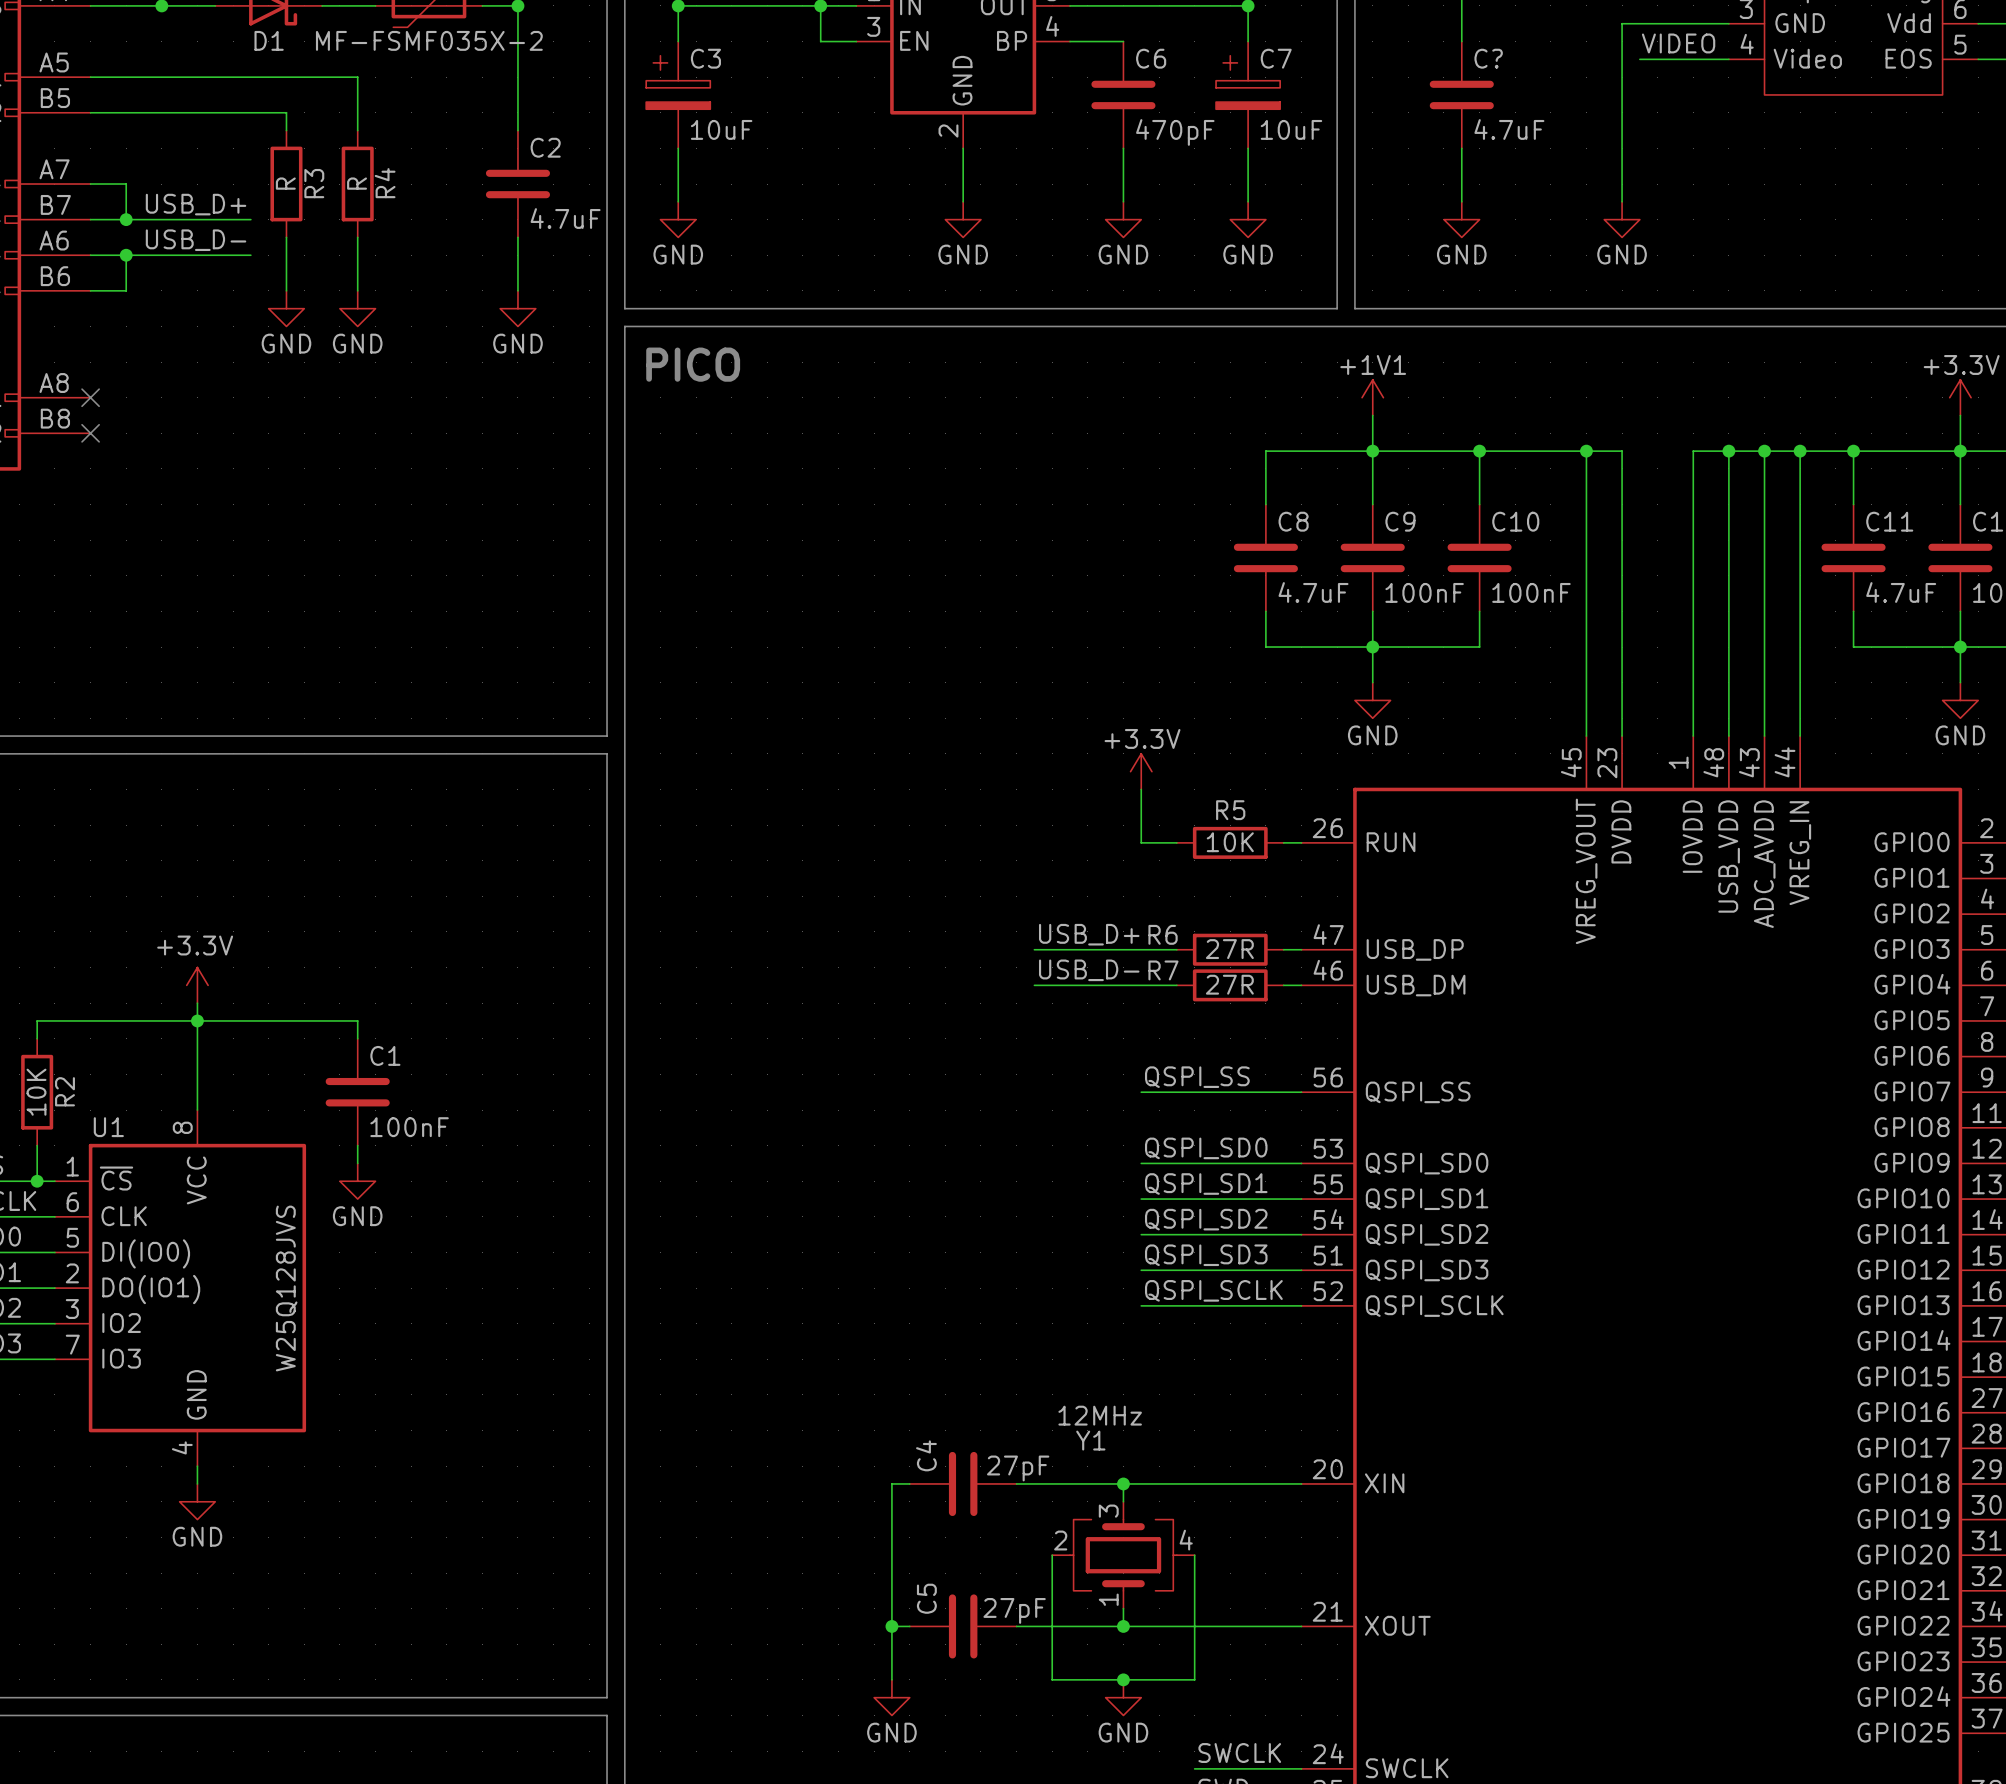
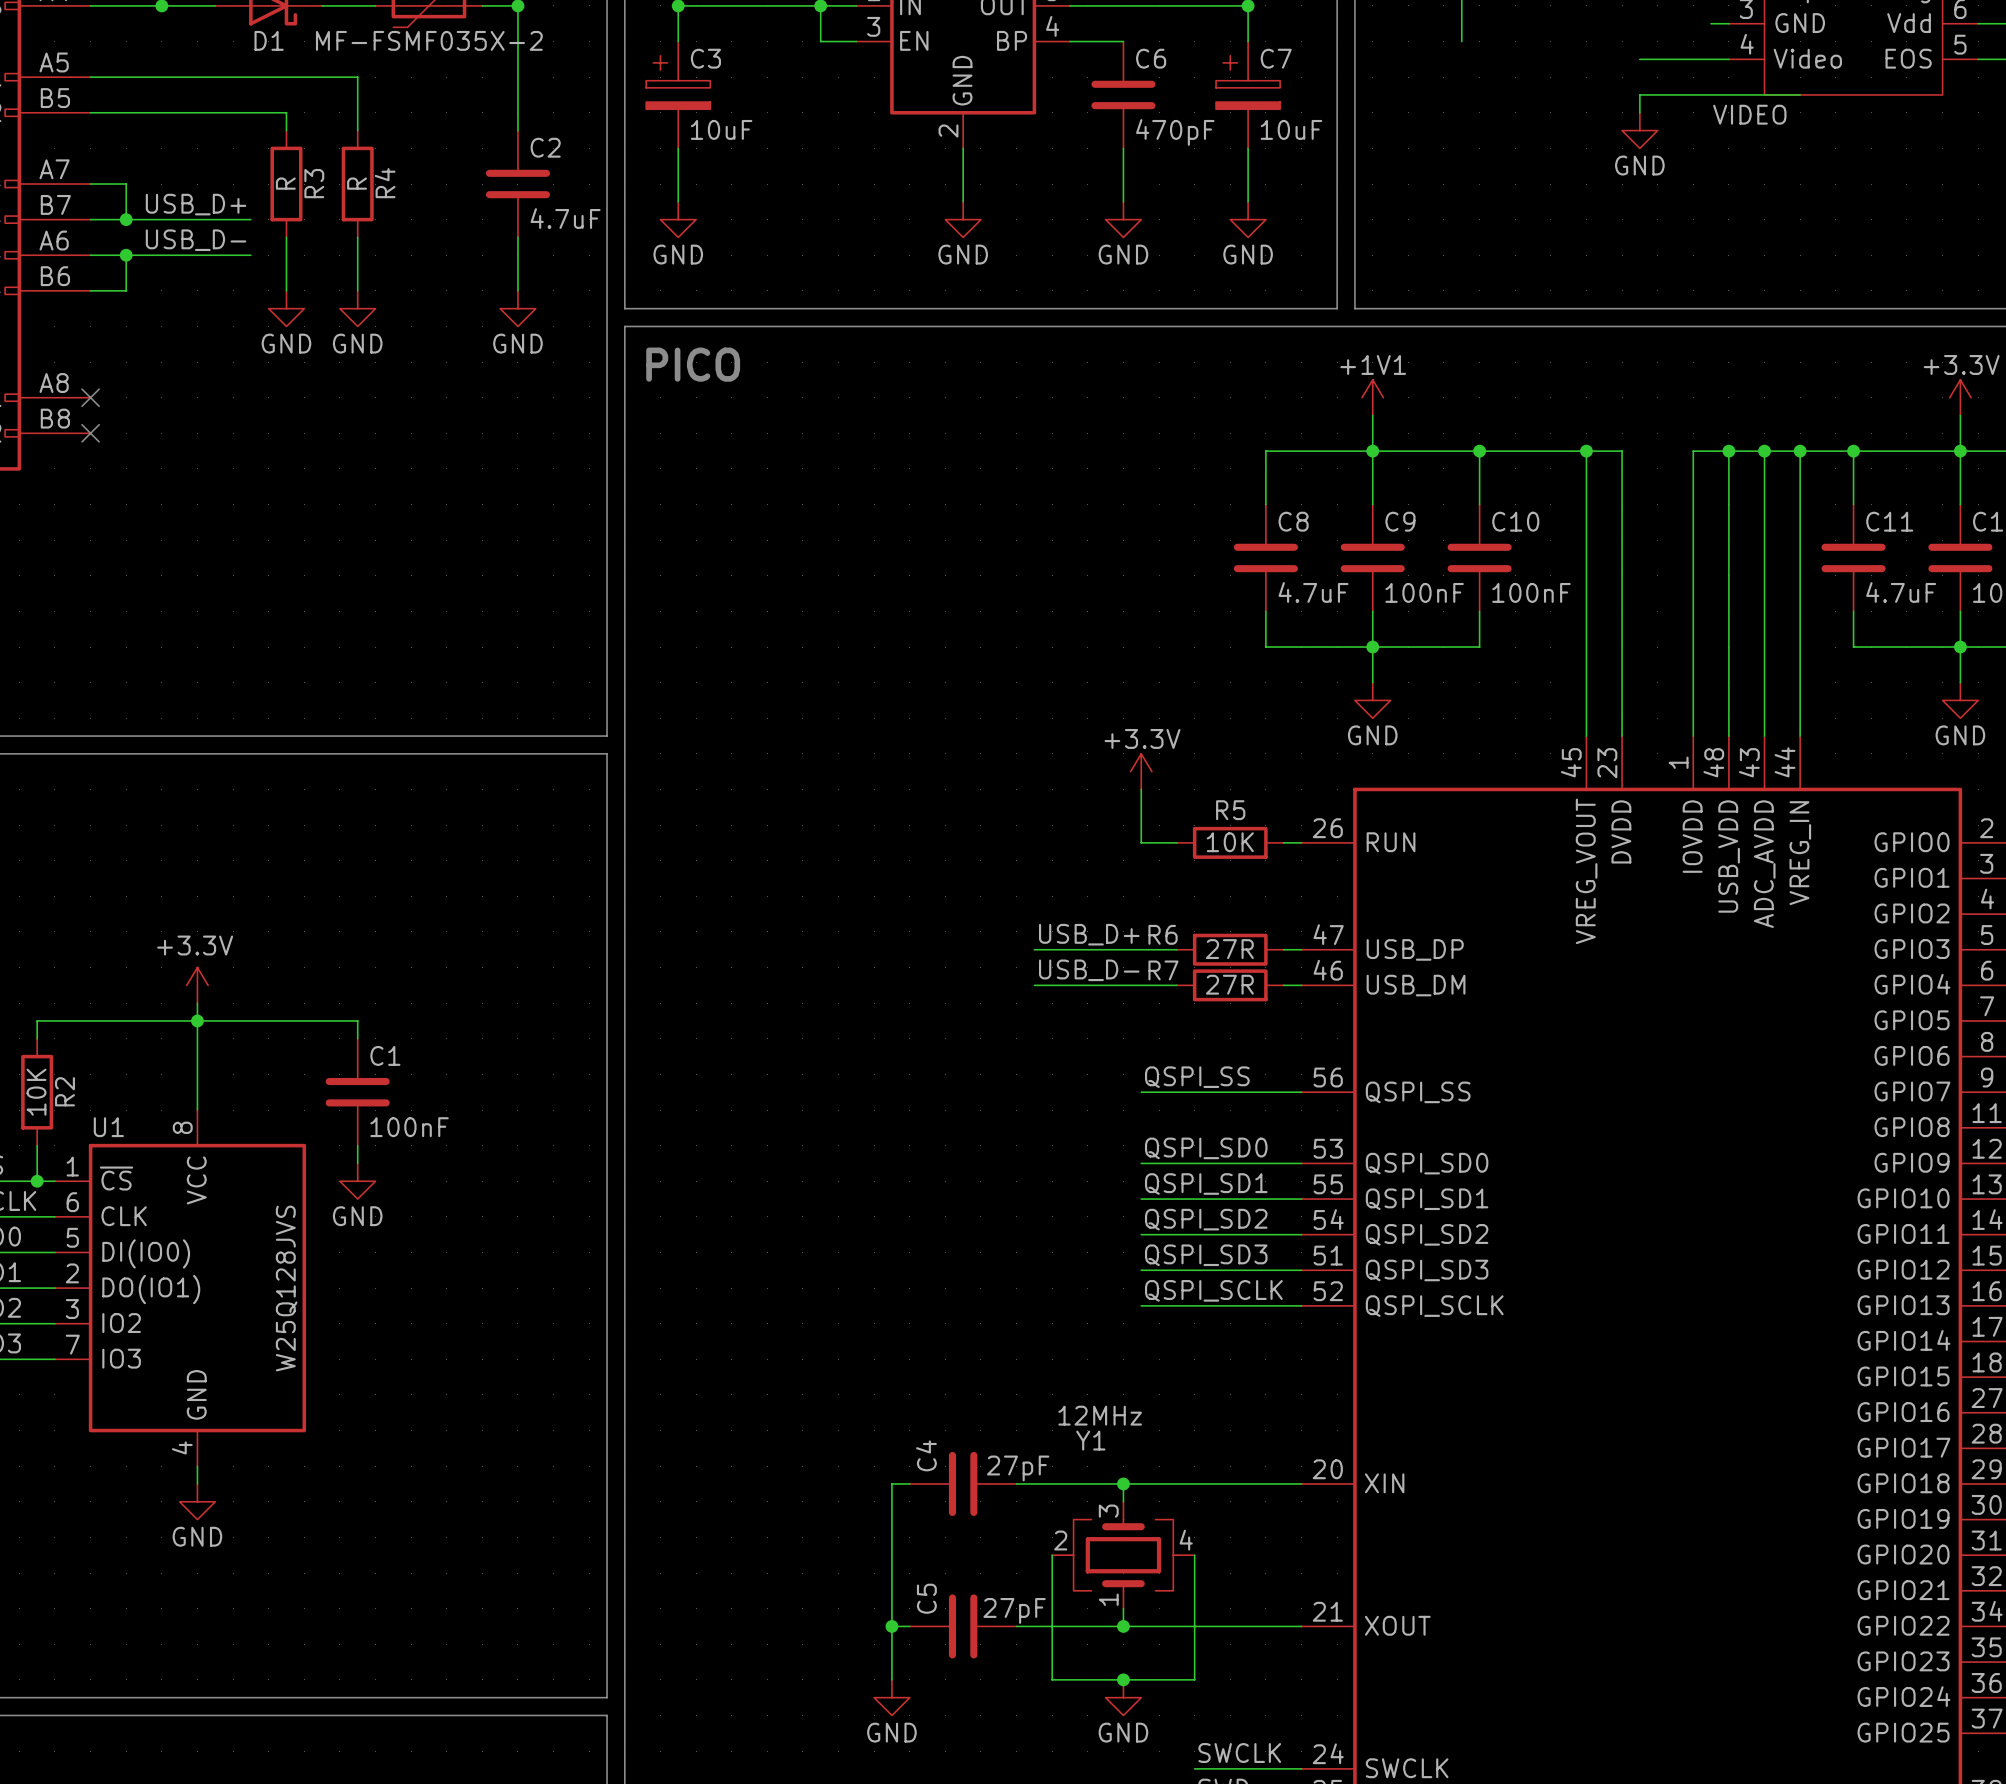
wire: (1711, 23) (1622, 23) (1622, 201) -> none
label position: VIDEO (1678, 43) -> VIDEO (1749, 114)
C?: 4.7uF (1461, 94) -> none
wire: none -> (1800, 94) (1639, 94) (1639, 112)
wire: (1461, 148) (1461, 201) -> none
power symbol: GND (1461, 219) -> none
power symbol position: GND (1622, 219) -> GND (1639, 130)

